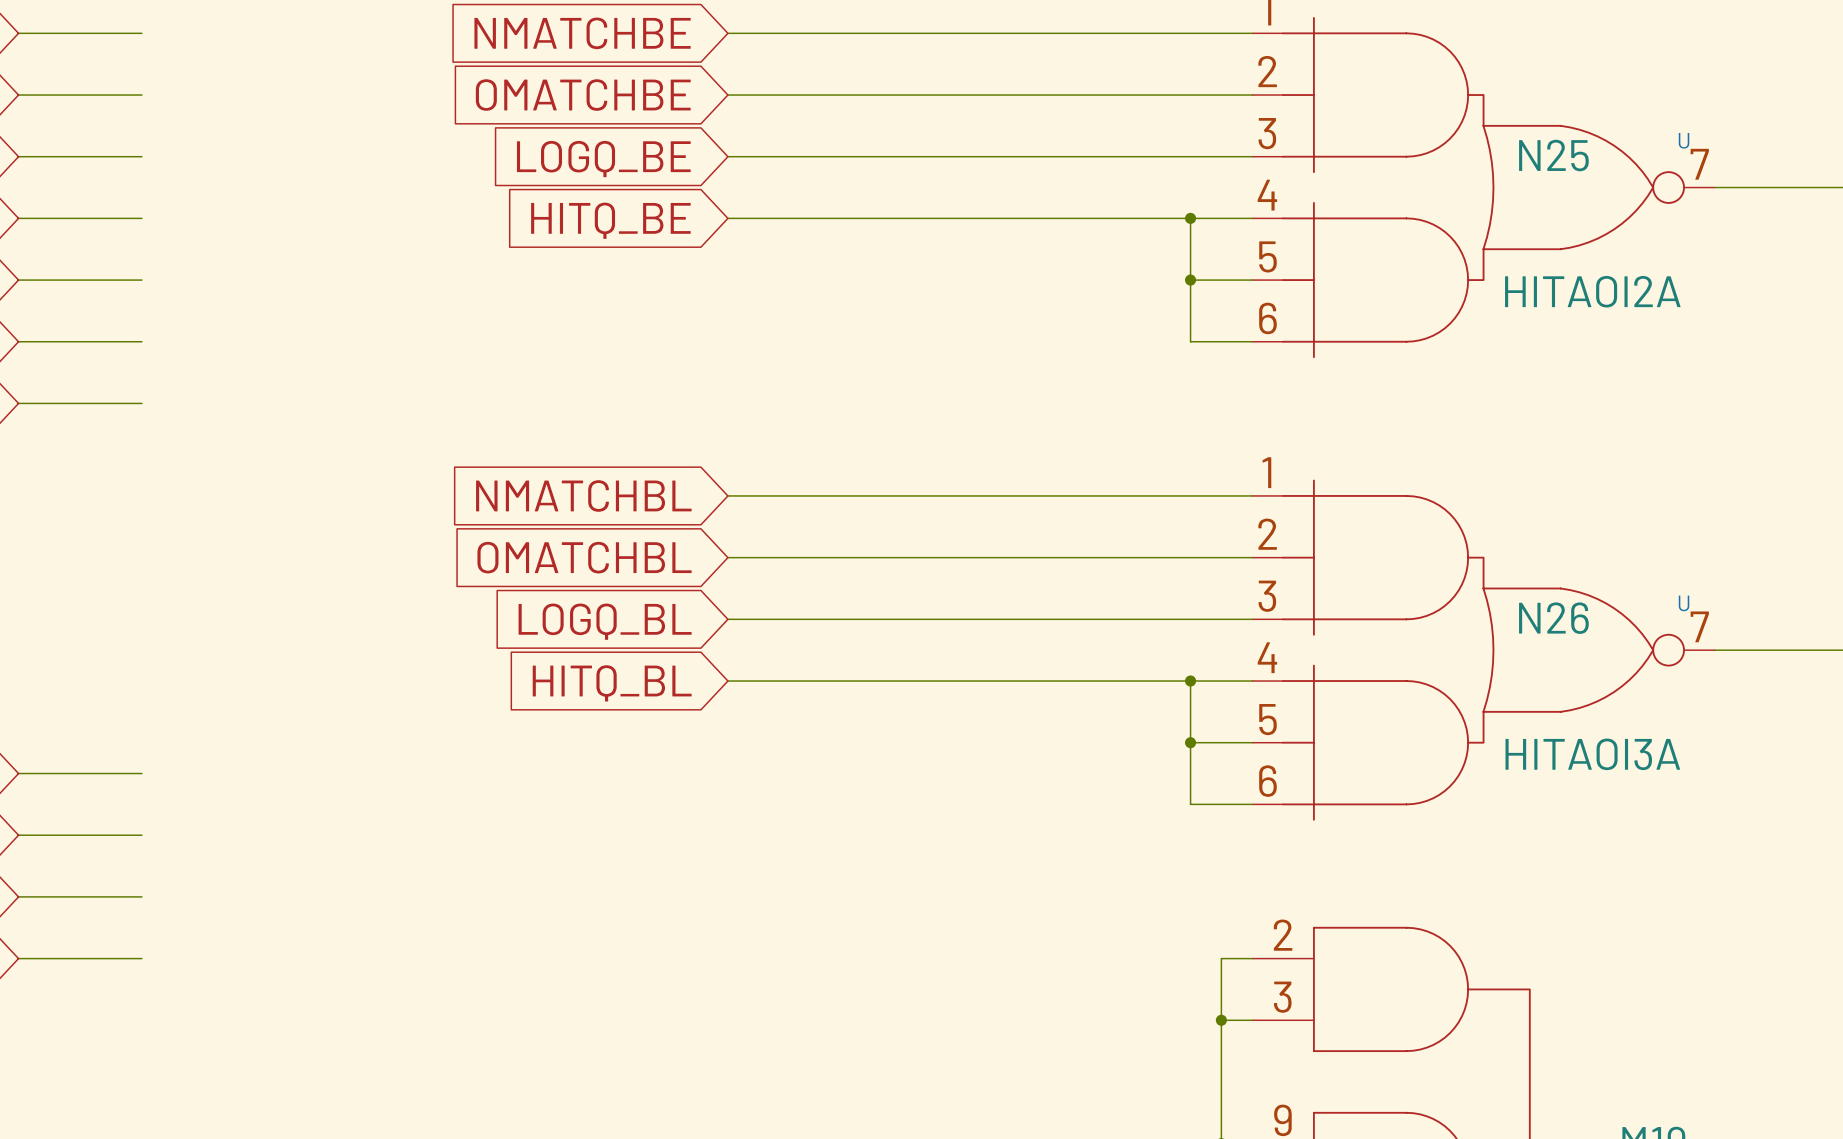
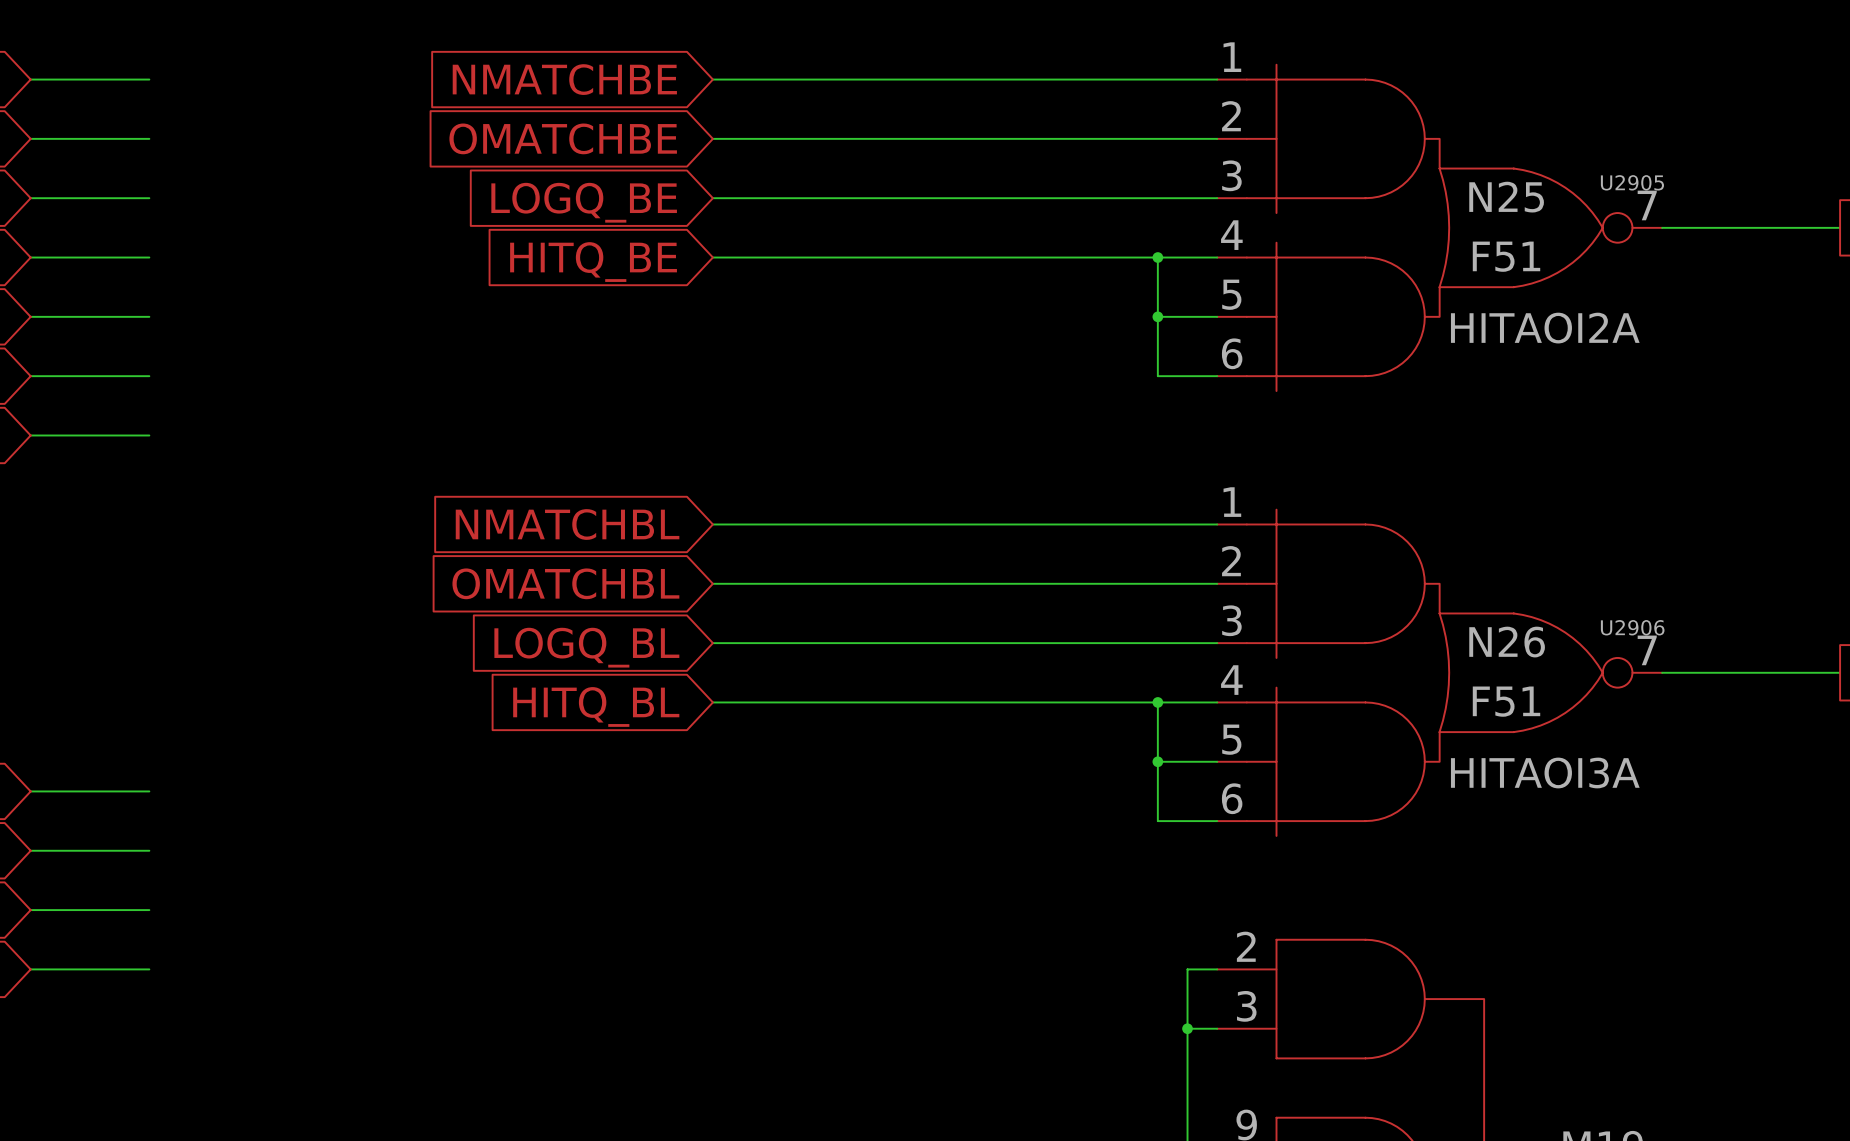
U name: U (1684, 140) -> U2905 (1632, 182)
U value: none -> F51 (1506, 256)
U name: U (1684, 603) -> U2906 (1632, 627)
U value: none -> F51 (1506, 701)

